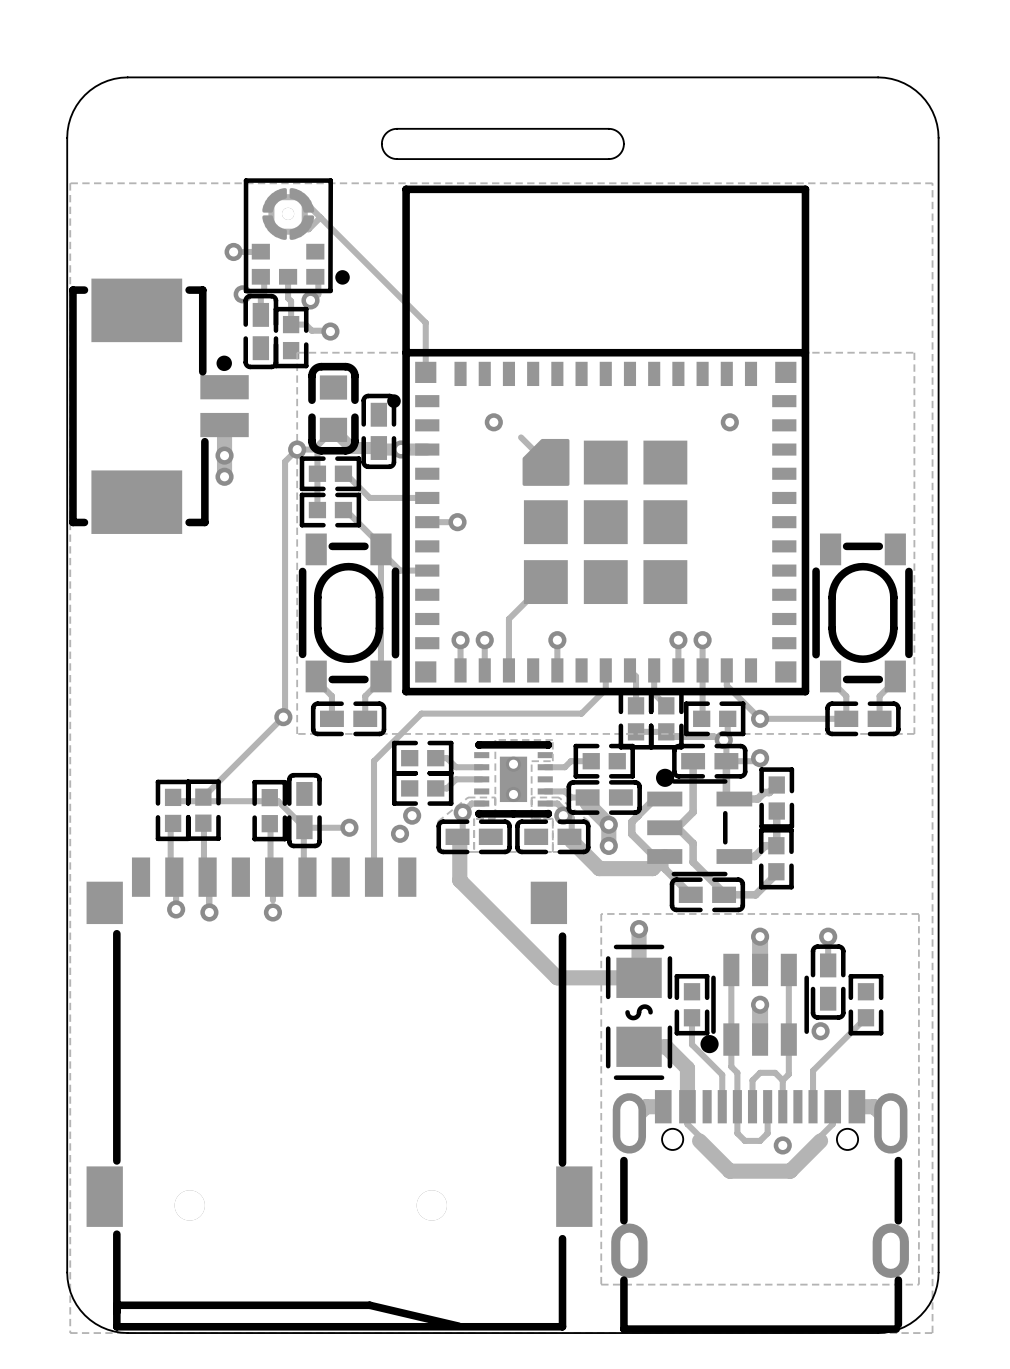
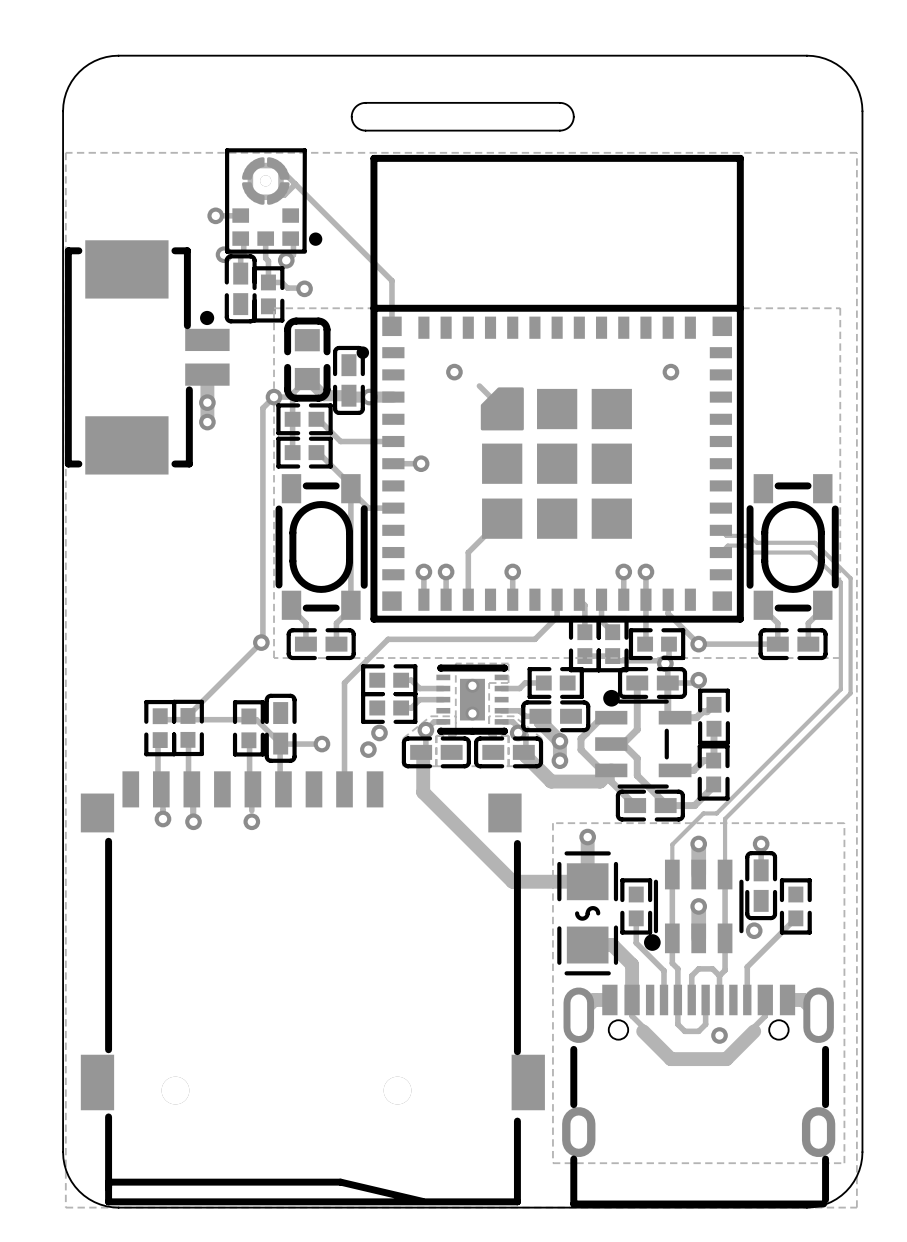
track: none -> (720, 530) (726, 535) (750, 535) (756, 542) (815, 542) (850, 578) (850, 693) (725, 818) (725, 874)
track: none -> (720, 552) (727, 545) (746, 545) (752, 552) (811, 552) (840, 582) (840, 689) (716, 813) (703, 813) (672, 844) (672, 874)

